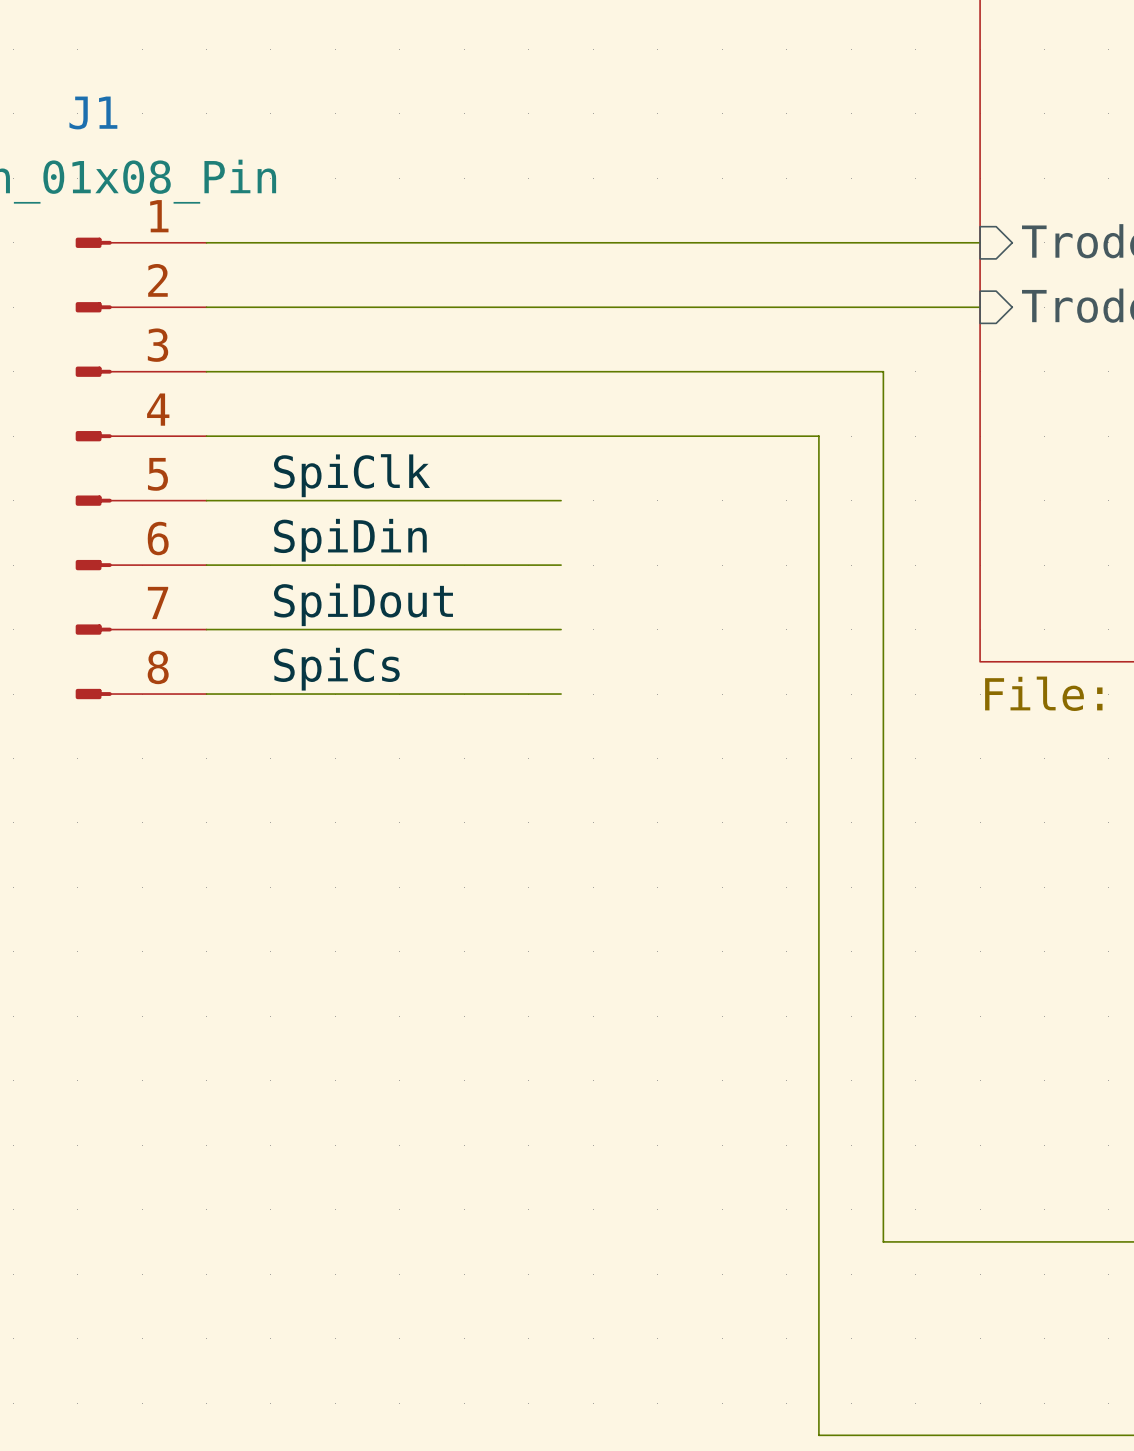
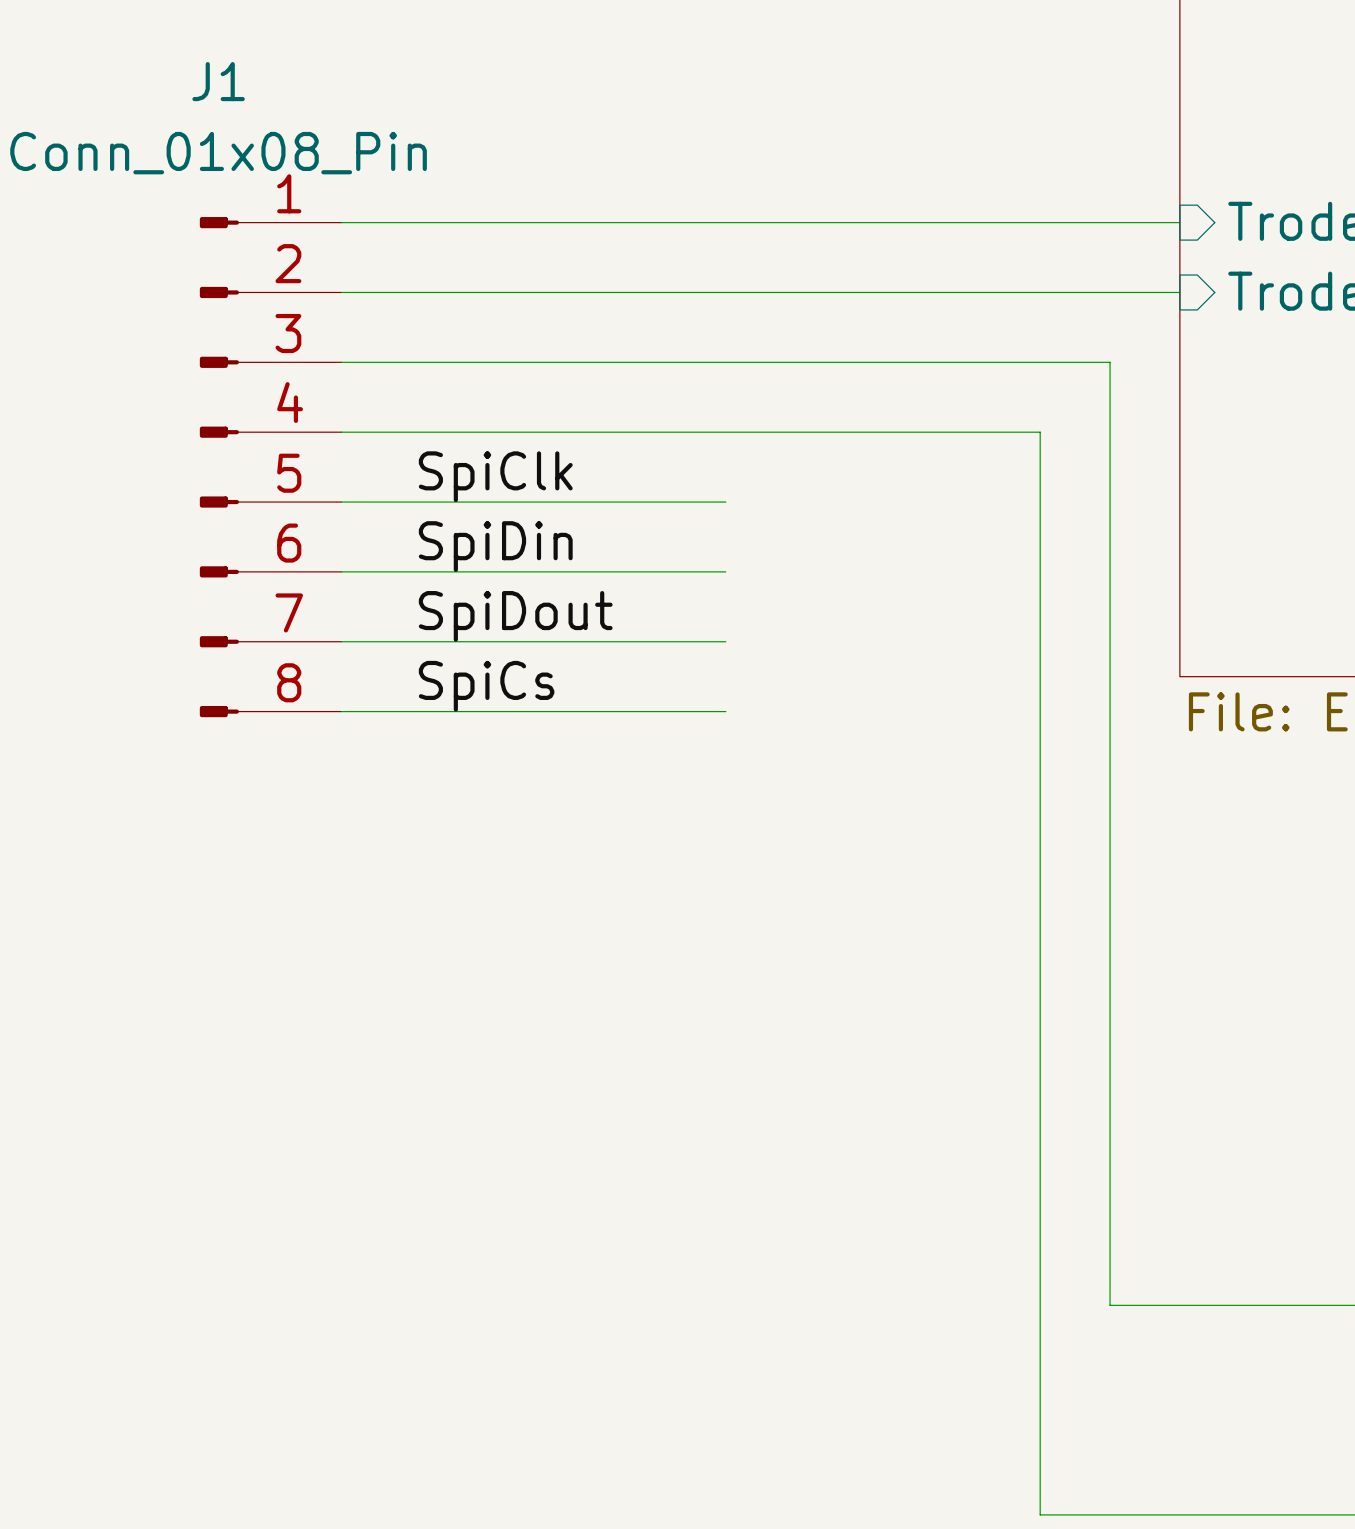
wire: (883, 371) (883, 1241) (915, 1241) -> (1075, 362) (1110, 362) (1110, 1305)
wire: (818, 436) (818, 1435) (851, 1435) -> (1005, 432) (1040, 432) (1040, 1514)

